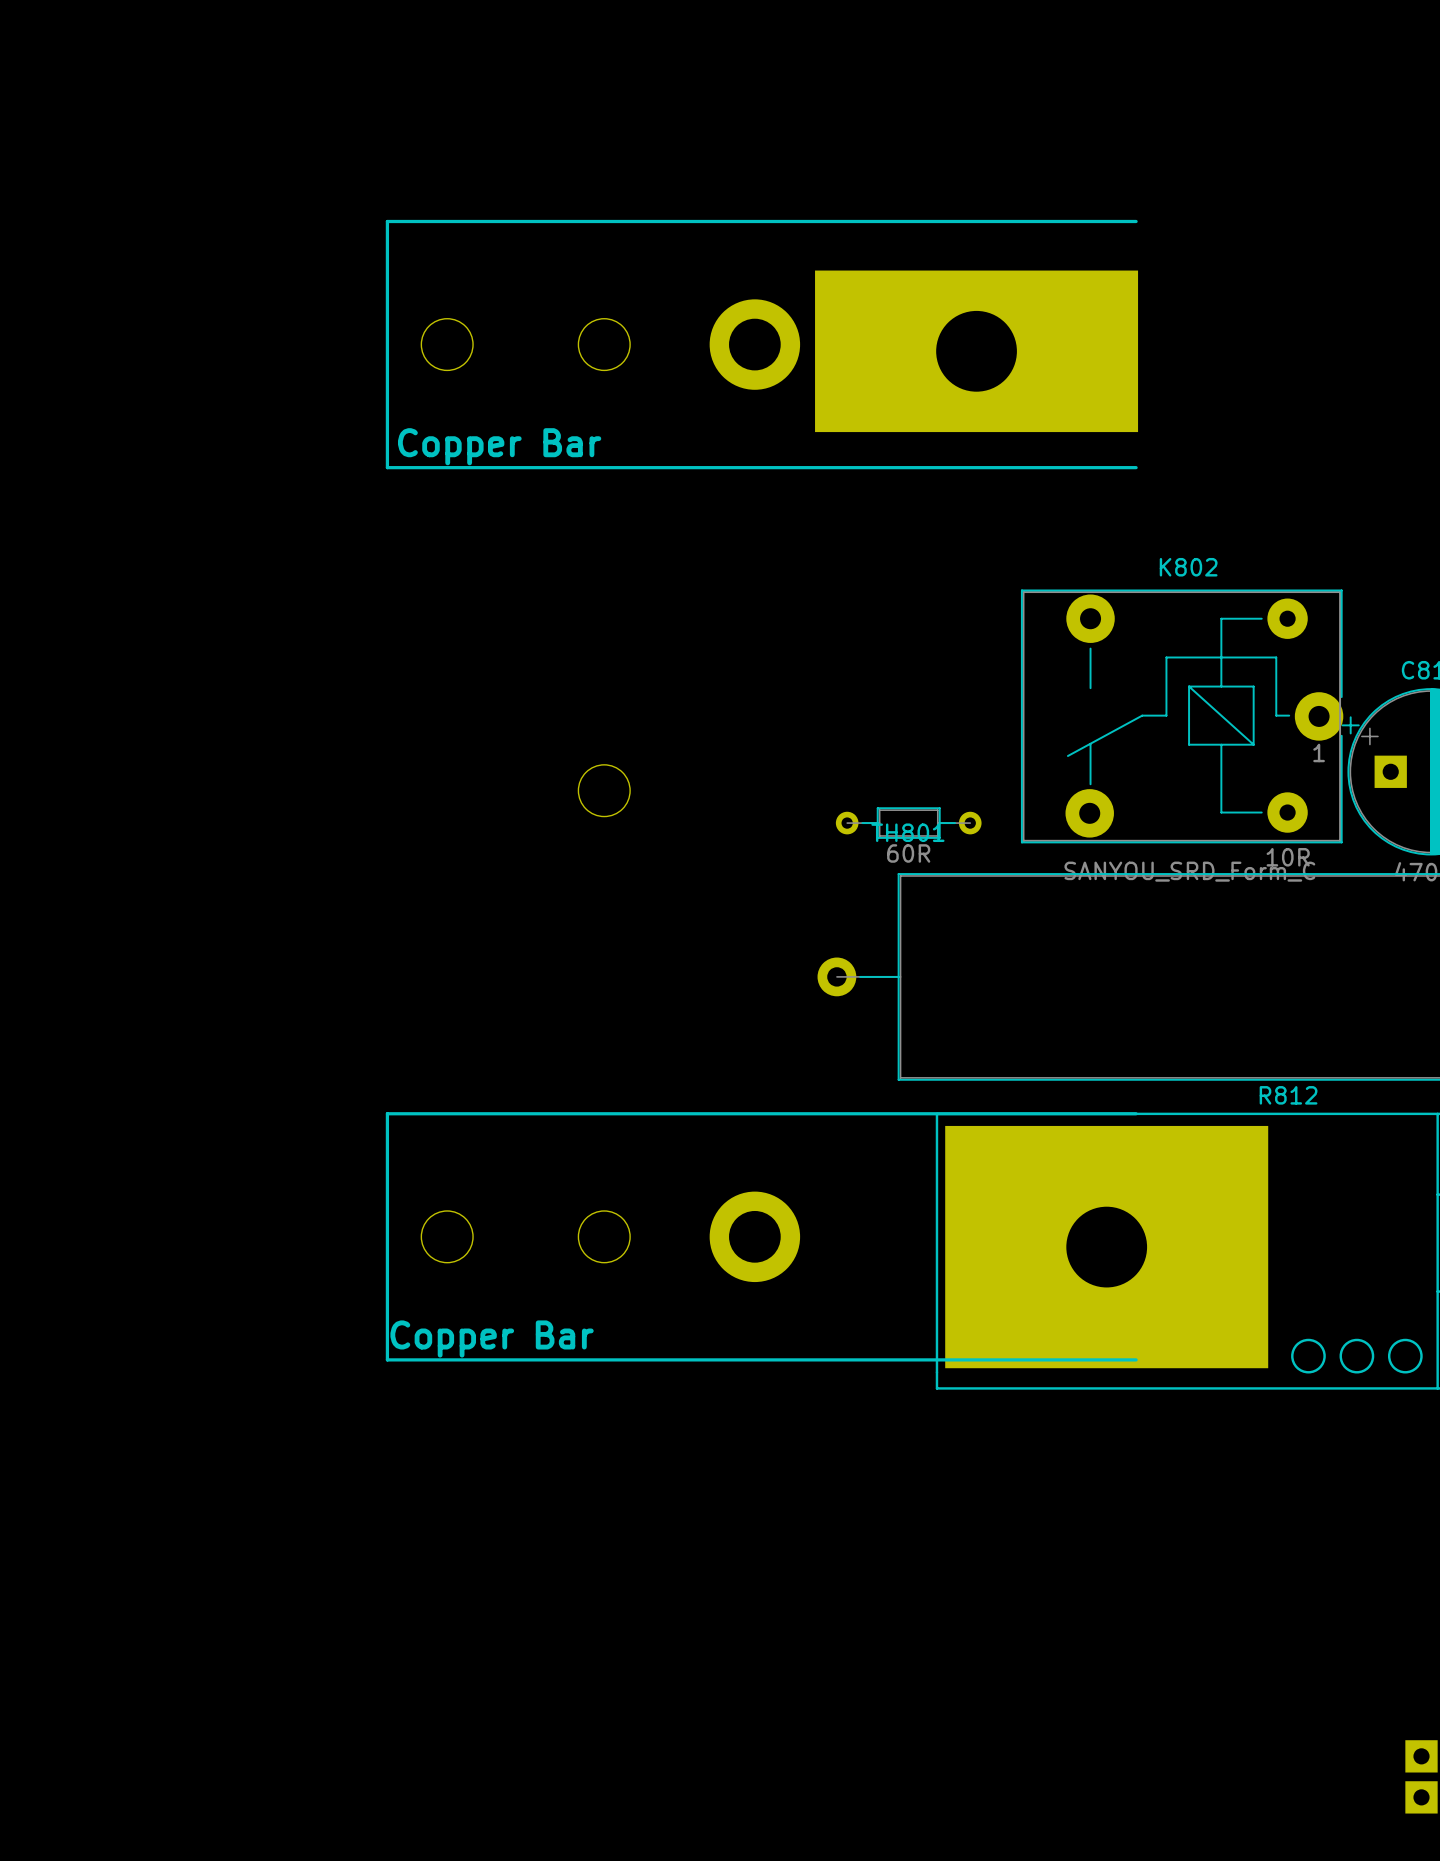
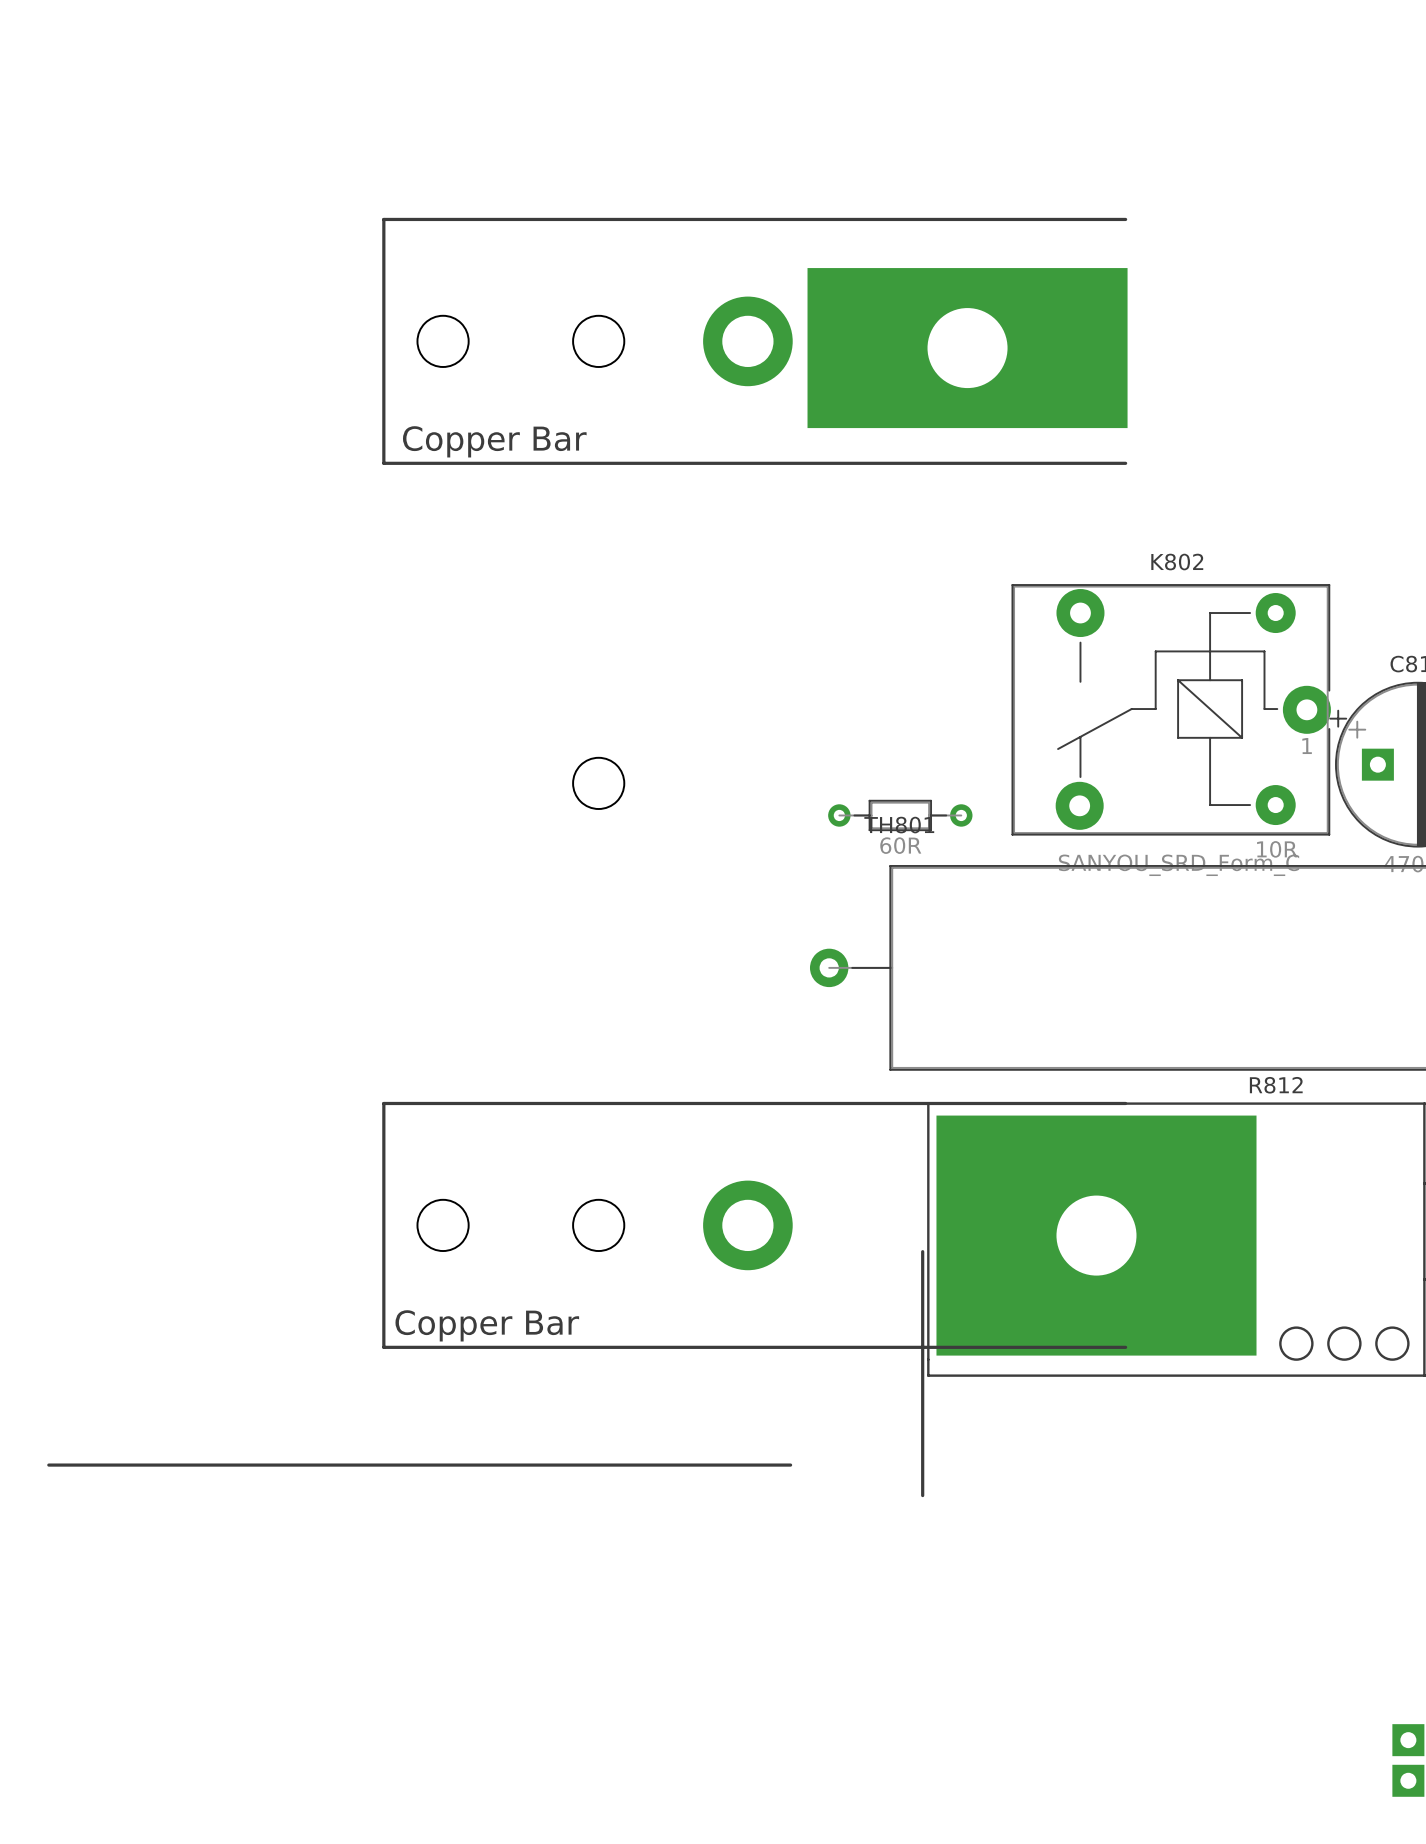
line: none -> (922, 1251) (922, 1495)
line: none -> (48, 1465) (790, 1465)

